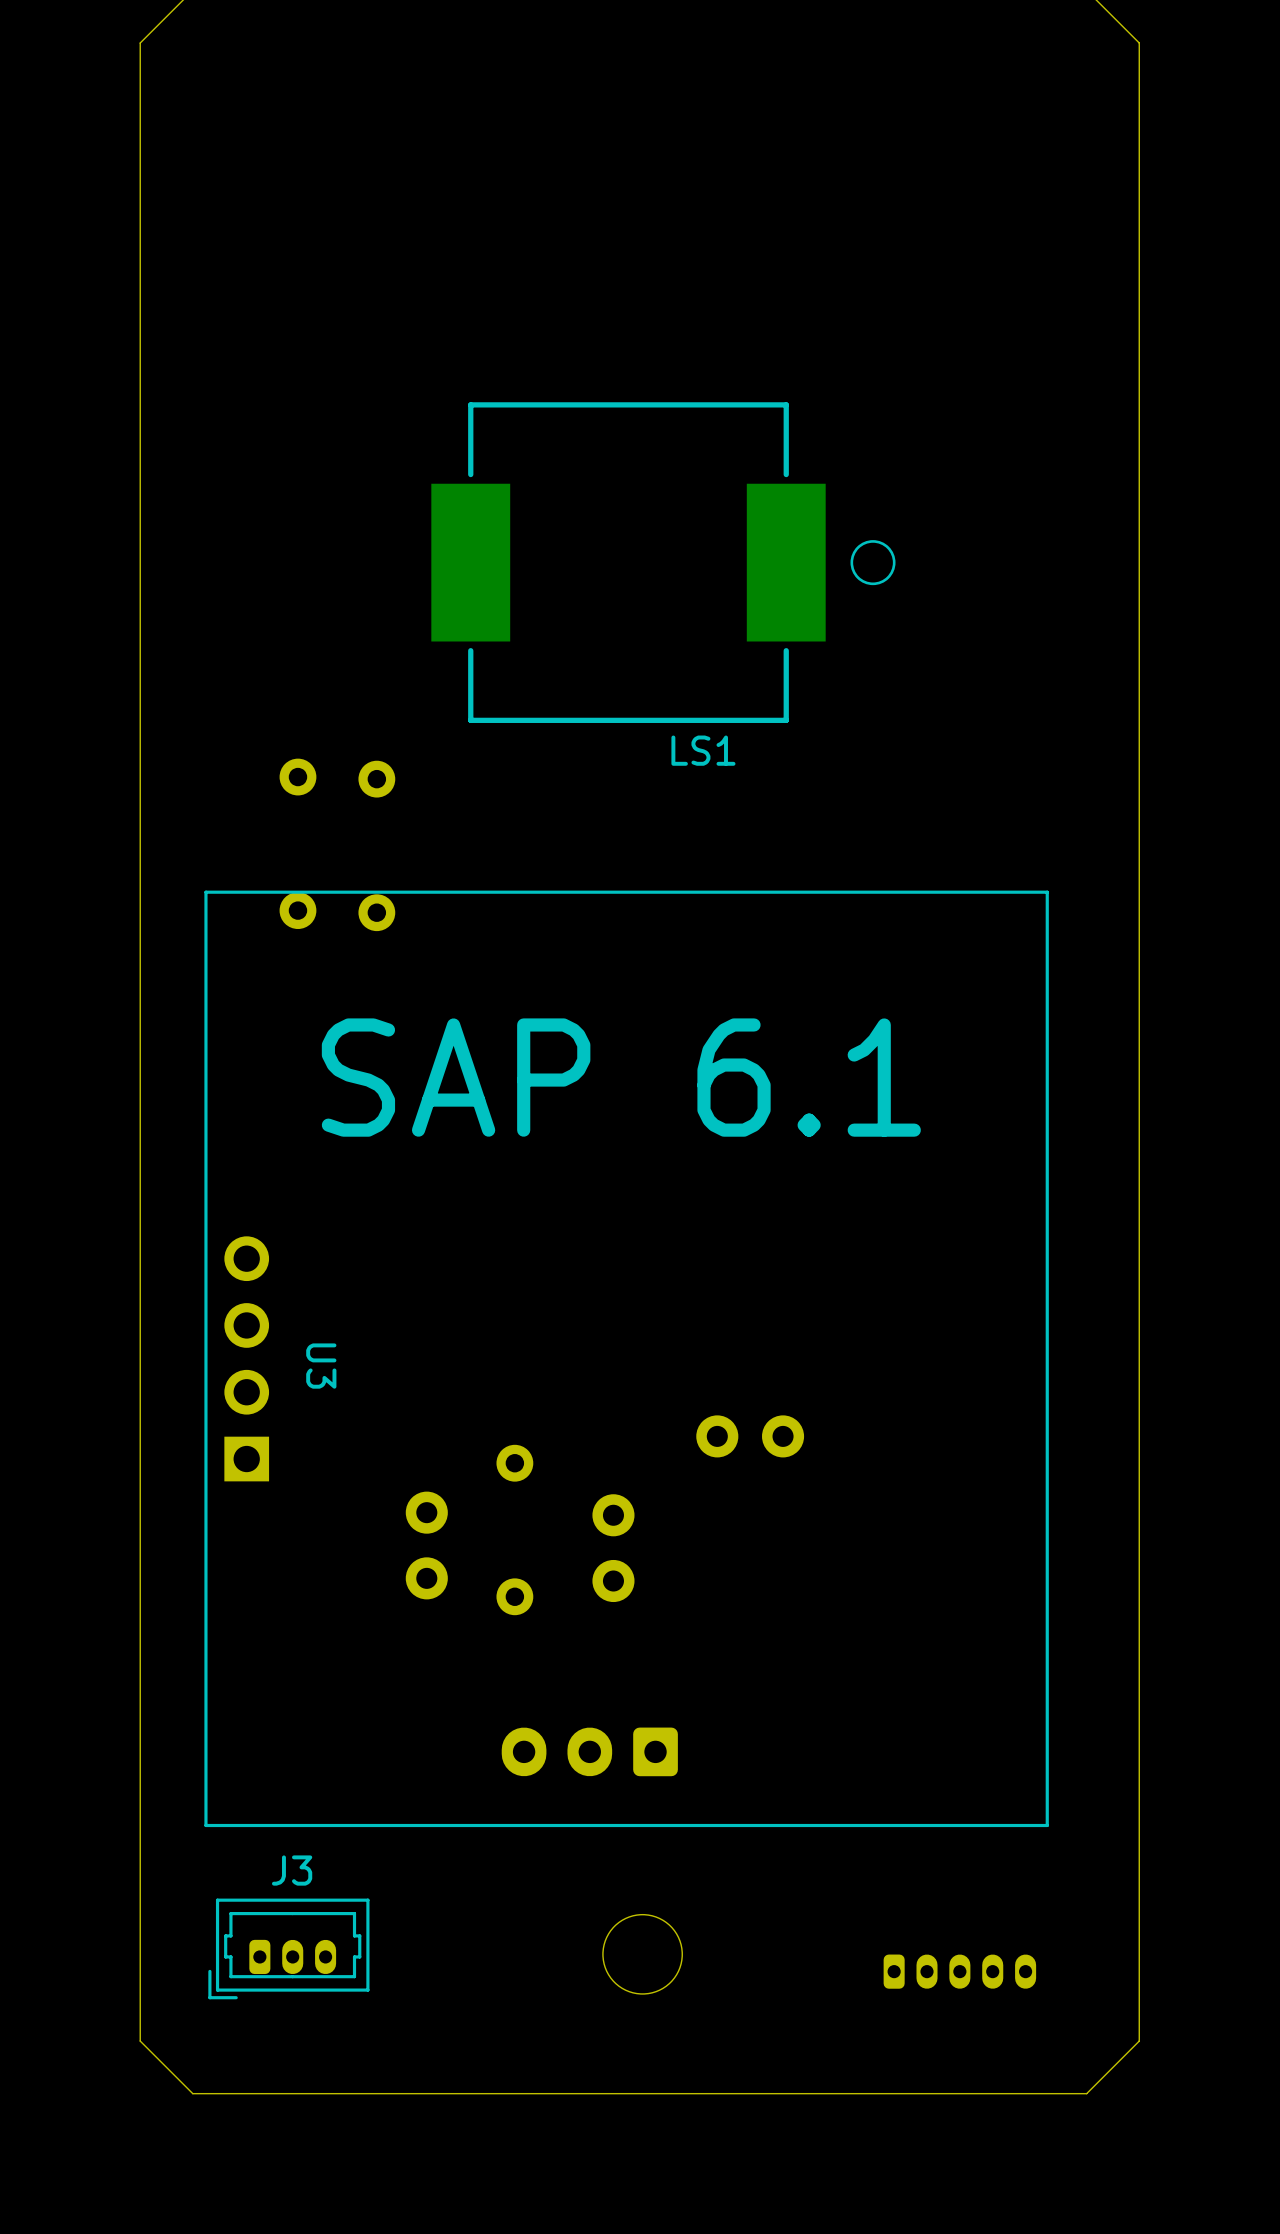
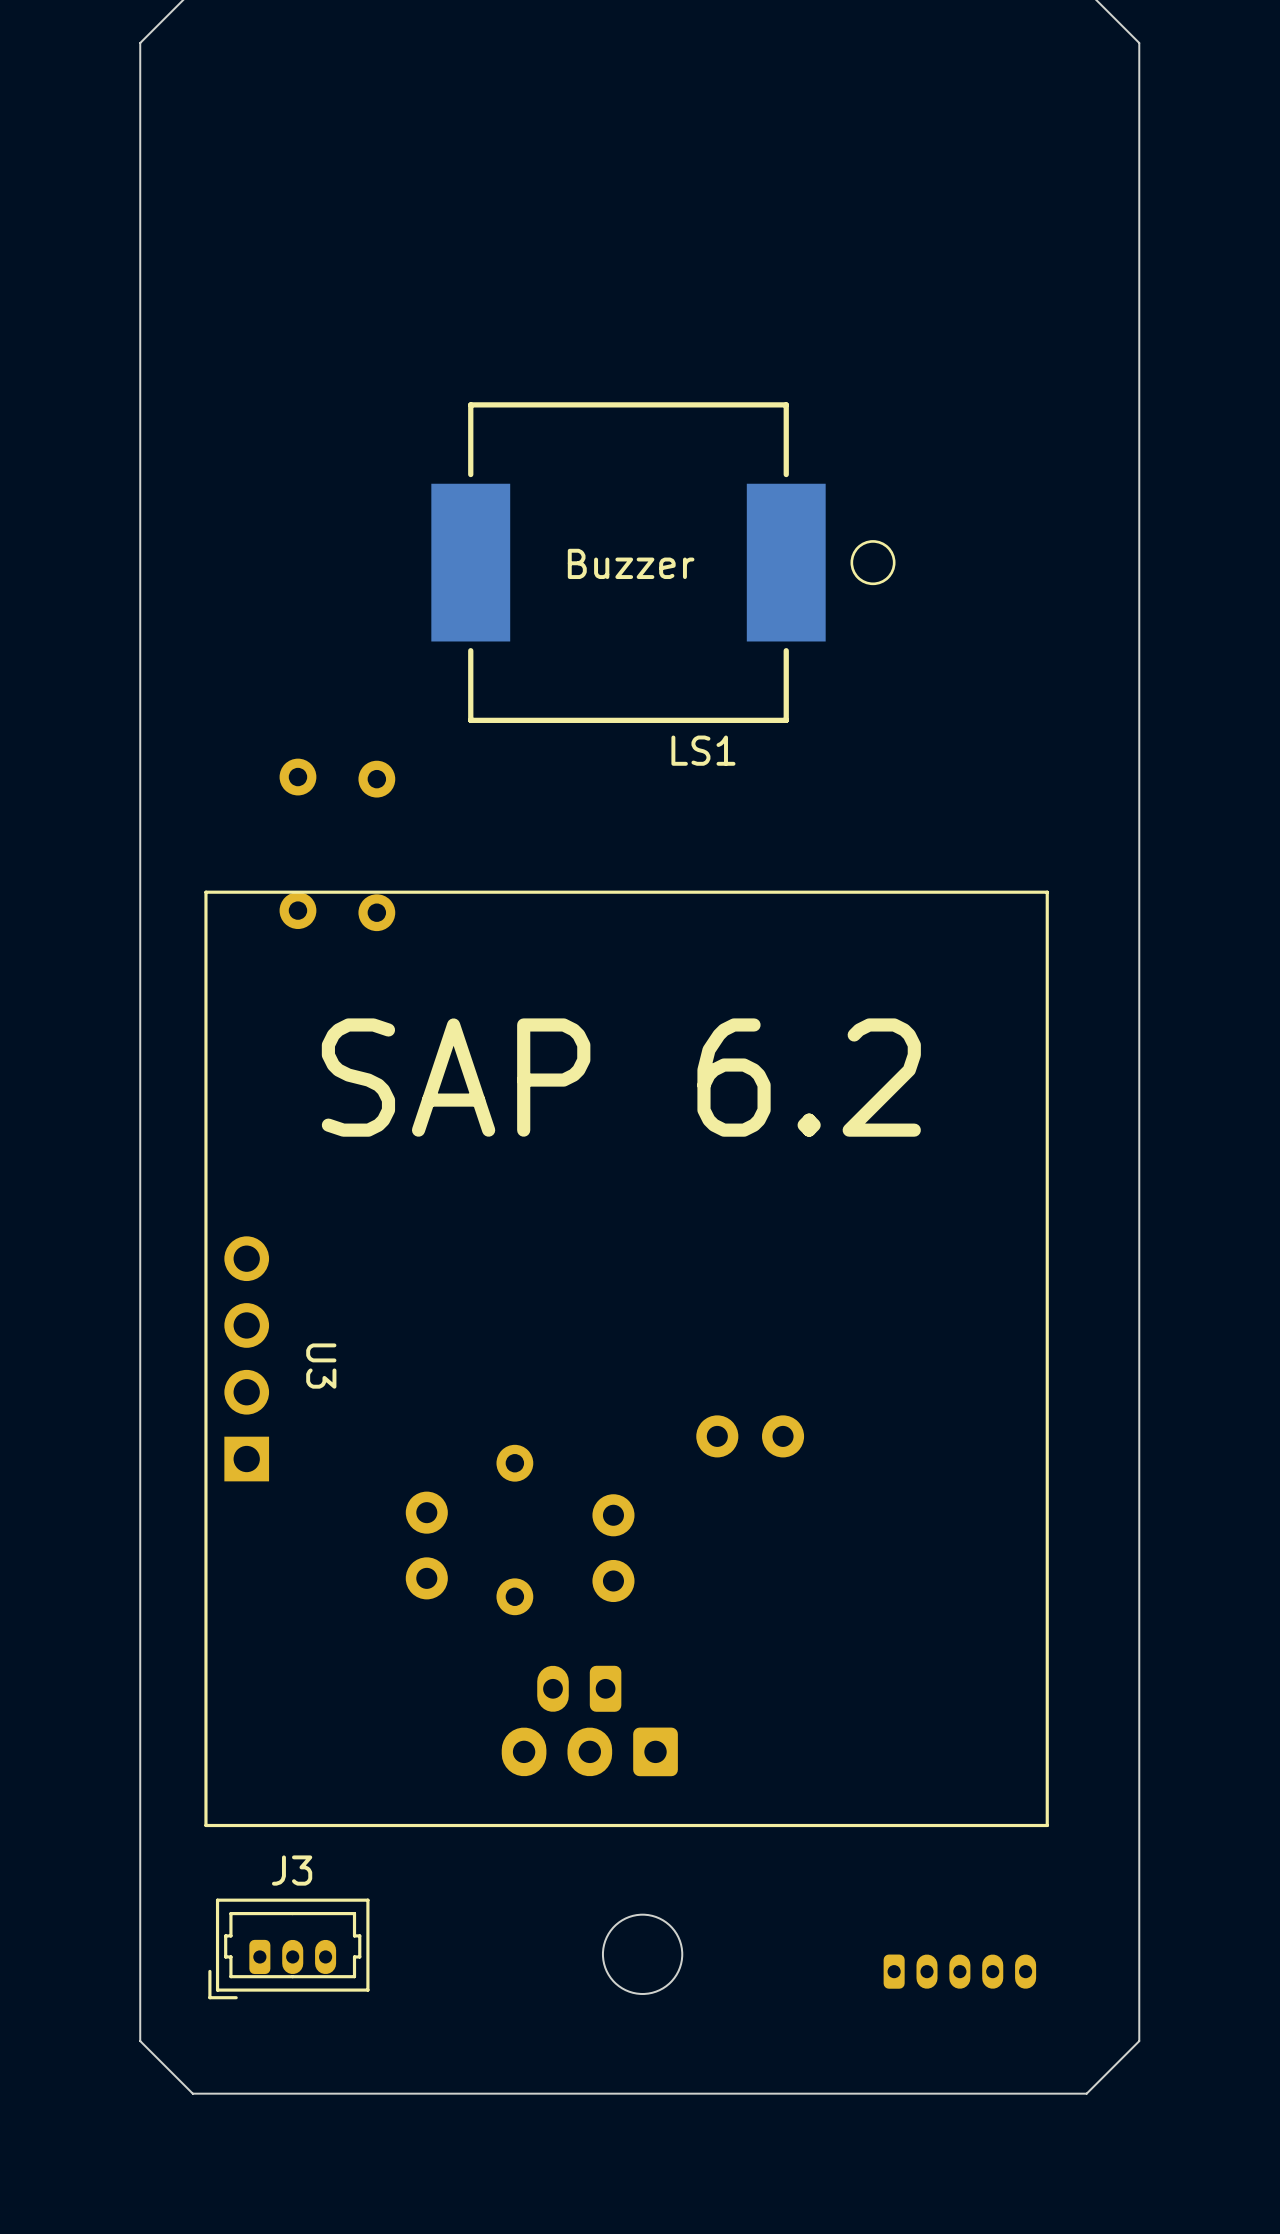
text: none -> Buzzer (631, 563)
text: SAP 6.1 (621, 1077) -> SAP 6.2 (621, 1077)
part: none -> (579, 1688)

